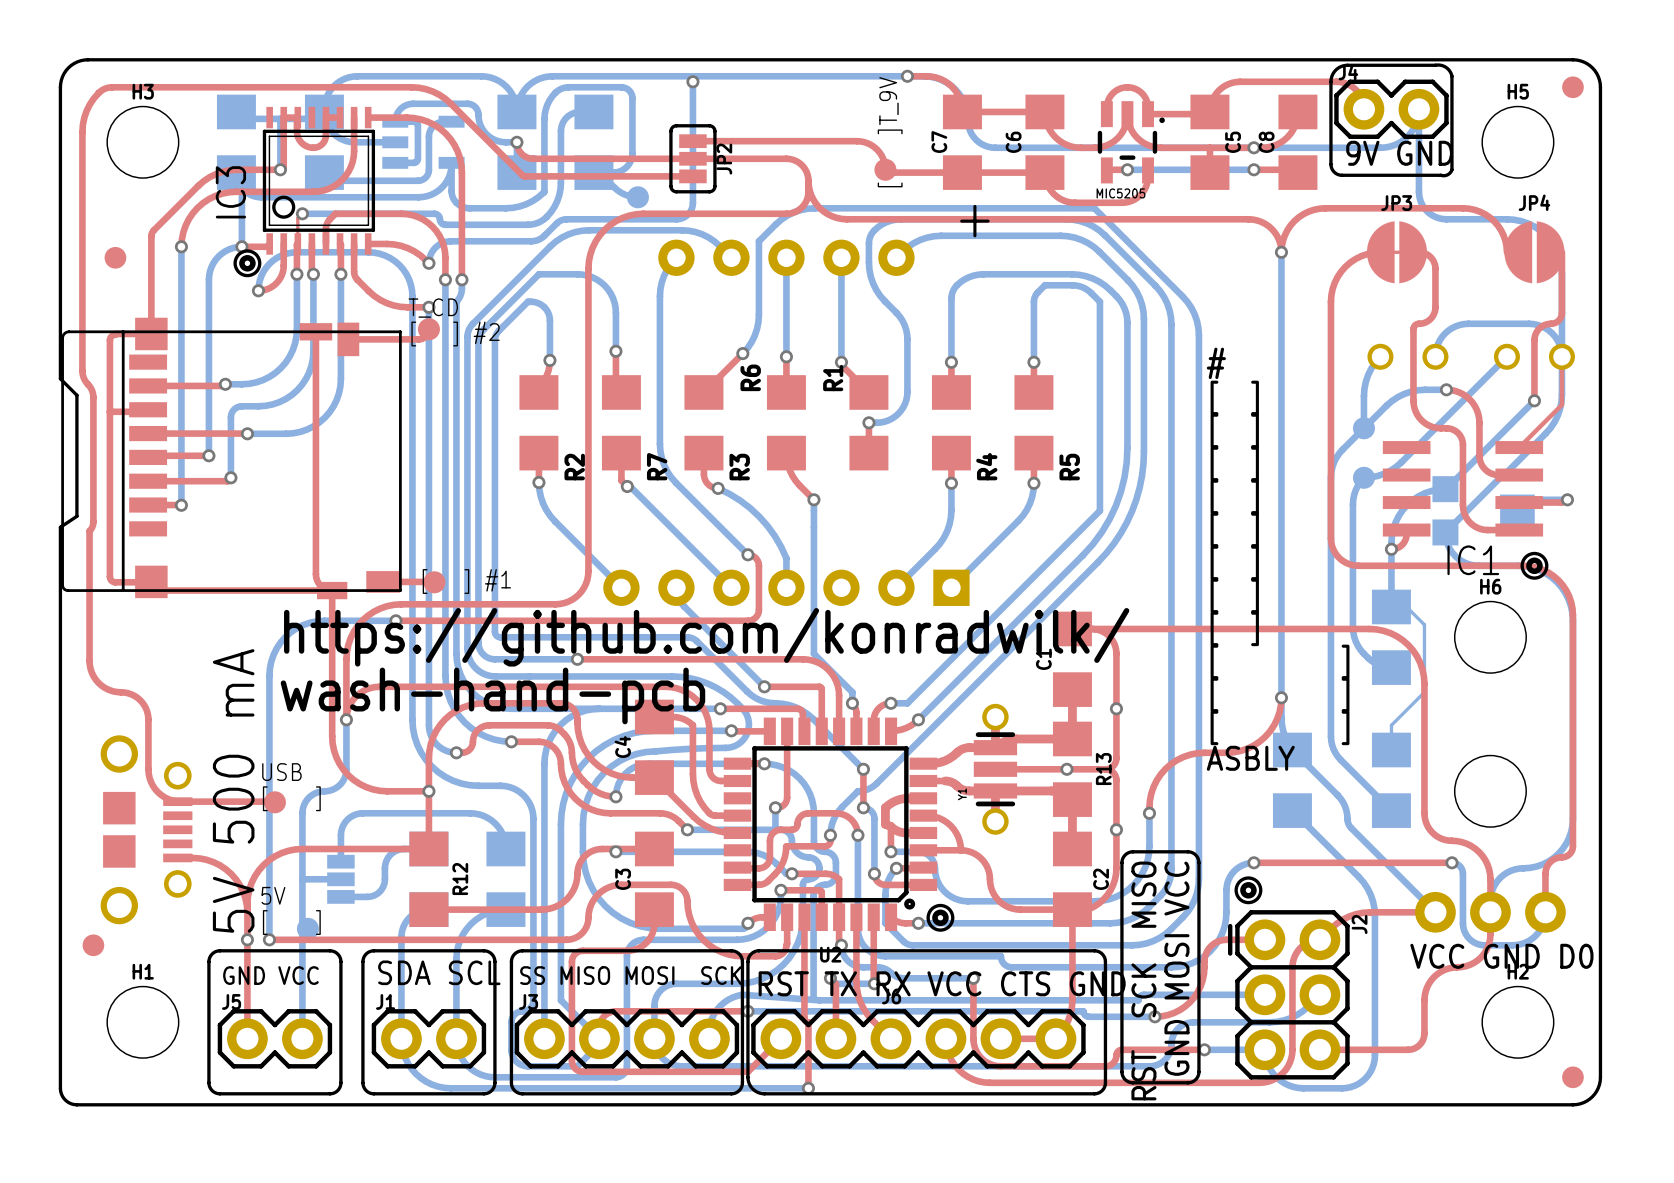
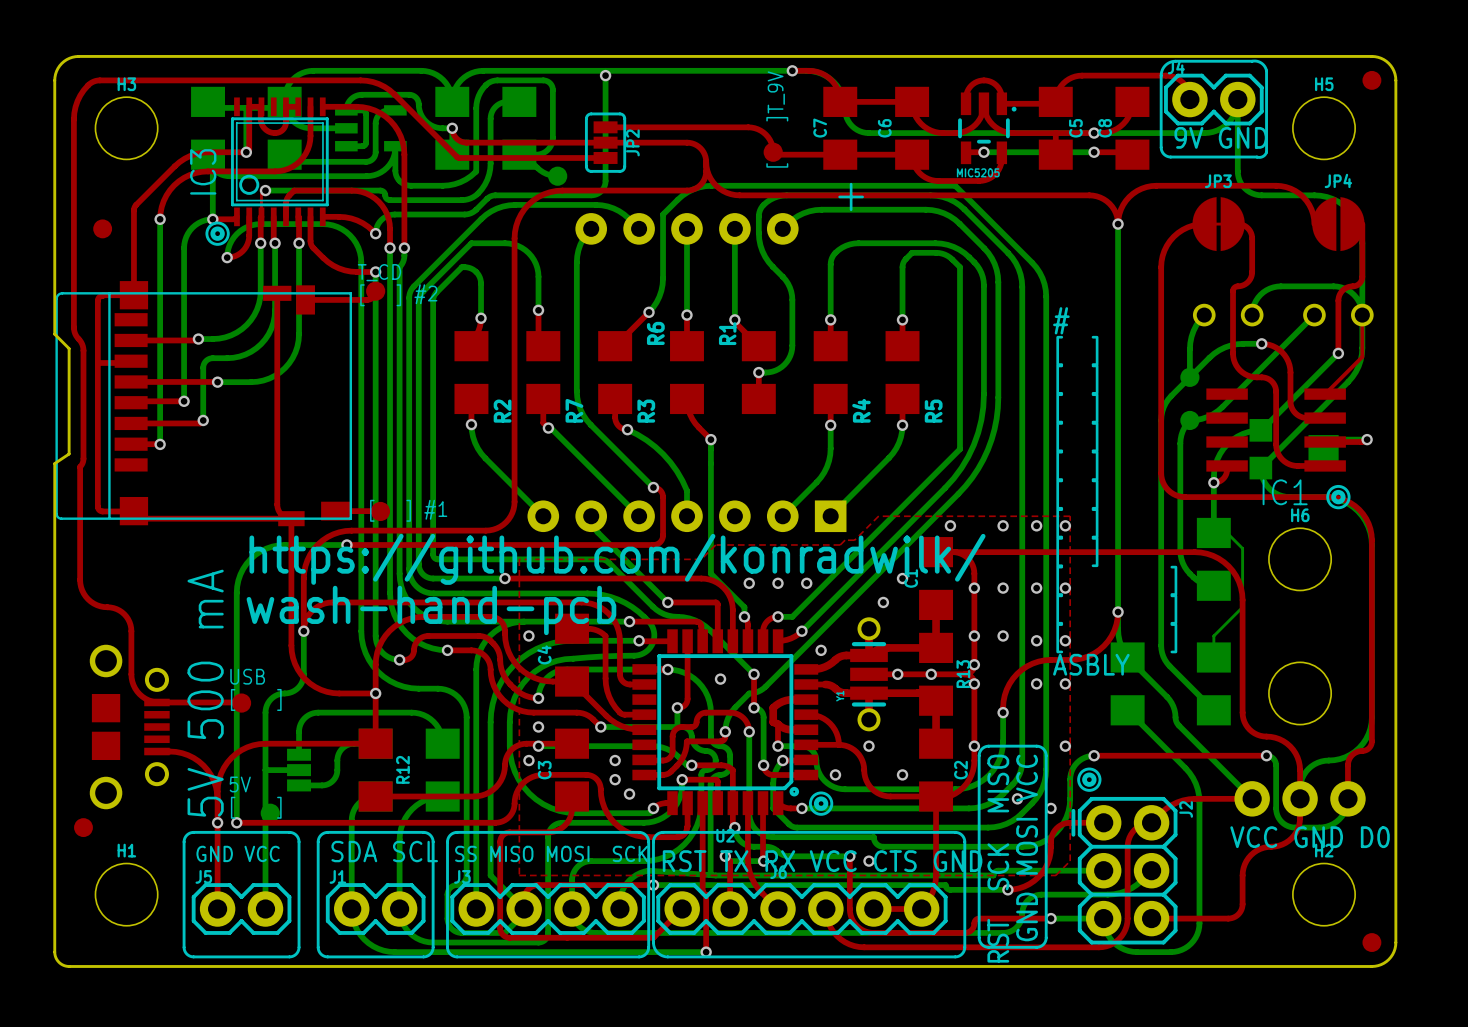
top zone outline: none -> (878, 516) (1070, 516) (1070, 861) (1055, 875) (519, 875) (519, 559) (701, 559) (715, 544) (840, 544) (845, 540) (854, 540) (878, 516)
via: none -> (950, 525)
via: none -> (1003, 525)
via: none -> (1036, 525)
via: none -> (1065, 525)
via: none -> (902, 578)
via: none -> (749, 583)
via: none -> (777, 583)
via: none -> (806, 583)
via: none -> (974, 588)
via: none -> (1003, 588)
via: none -> (1036, 588)
via: none -> (1065, 588)
via: none -> (883, 602)
via position: (1116, 708) -> (974, 636)
via: none -> (528, 636)
via: none -> (1003, 636)
via: none -> (1036, 640)
via: none -> (1065, 640)
via: none -> (821, 650)
via: none -> (974, 664)
via: none -> (897, 674)
via: none -> (720, 679)
via: none -> (974, 683)
via: none -> (1036, 683)
via: none -> (1065, 683)
via: none -> (538, 727)
via position: (1116, 829) -> (974, 746)
via: none -> (869, 746)
via: none -> (1065, 746)
via: none -> (528, 760)
via: none -> (615, 760)
via: none -> (835, 774)
via: none -> (902, 774)
via: none -> (615, 779)
via: none -> (629, 794)
via: none -> (1017, 798)
via: none -> (1051, 808)
via: none -> (869, 861)

